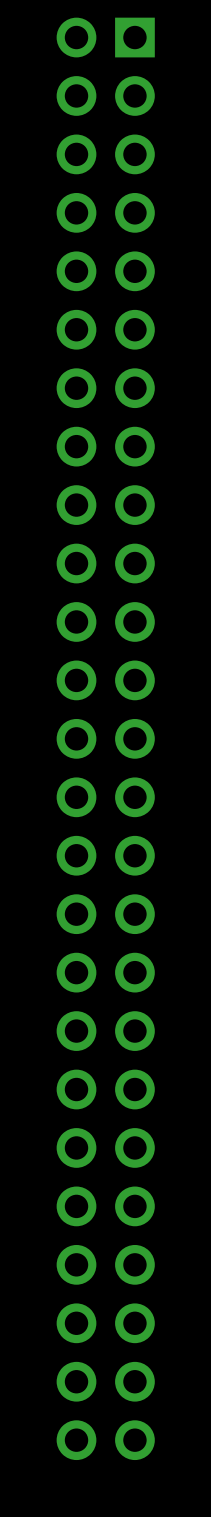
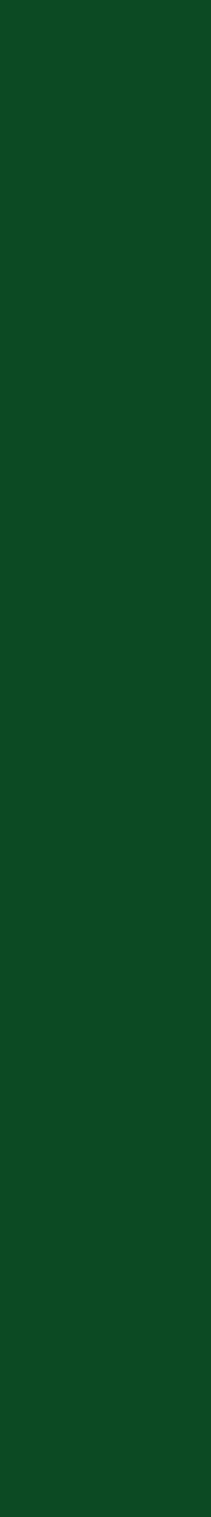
part: (105, 738) -> none

